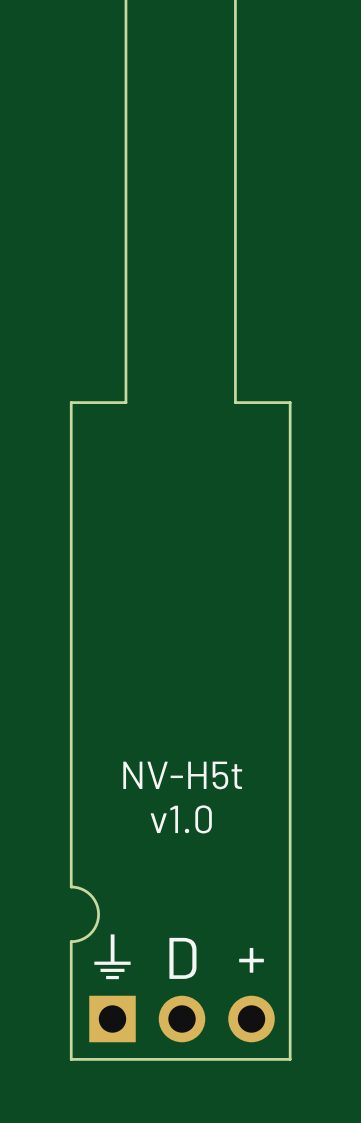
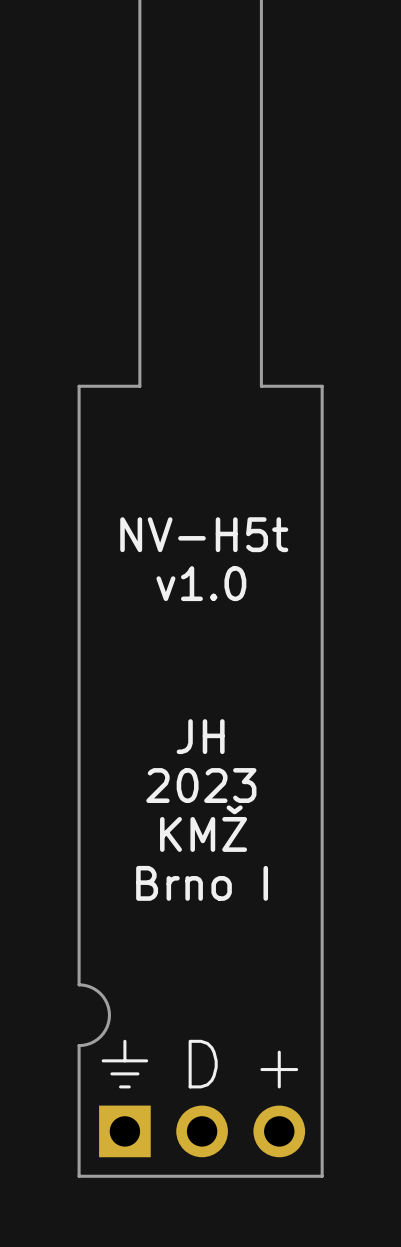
board edge: (125, 347) (125, 402) (71, 402) -> (139, 386) (79, 386) (79, 447)
board edge: (235, 347) (235, 402) (290, 402) -> (261, 386) (322, 386) (322, 447)
text: none -> JH (200, 736)
text: none -> 2023 (201, 785)
text: none -> KMŽ (203, 828)
text position: NV-H5t (182, 775) -> NV-H5t (204, 534)
text: none -> Brno I (202, 883)
text position: v1.0 (181, 819) -> v1.0 (201, 583)

